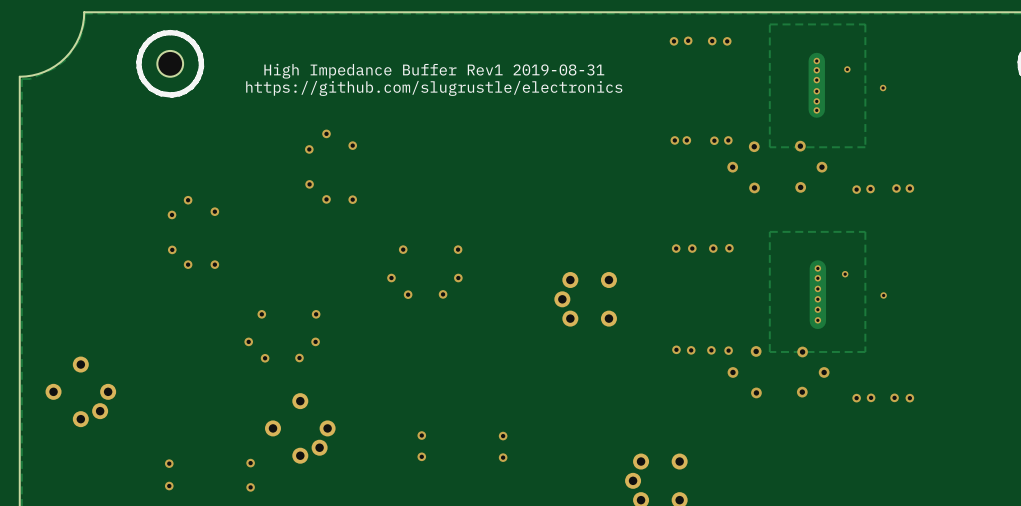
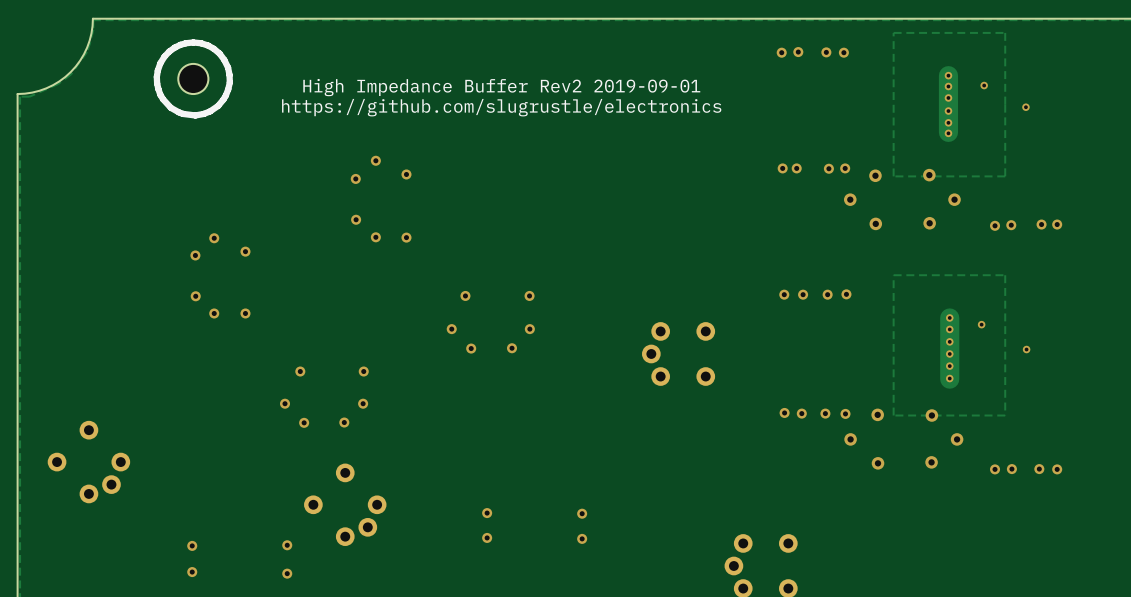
text: High Impedance Buffer Rev1 2019-08-31 (434, 71) -> High Impedance Buffer Rev2 2019-09-01 (501, 87)

